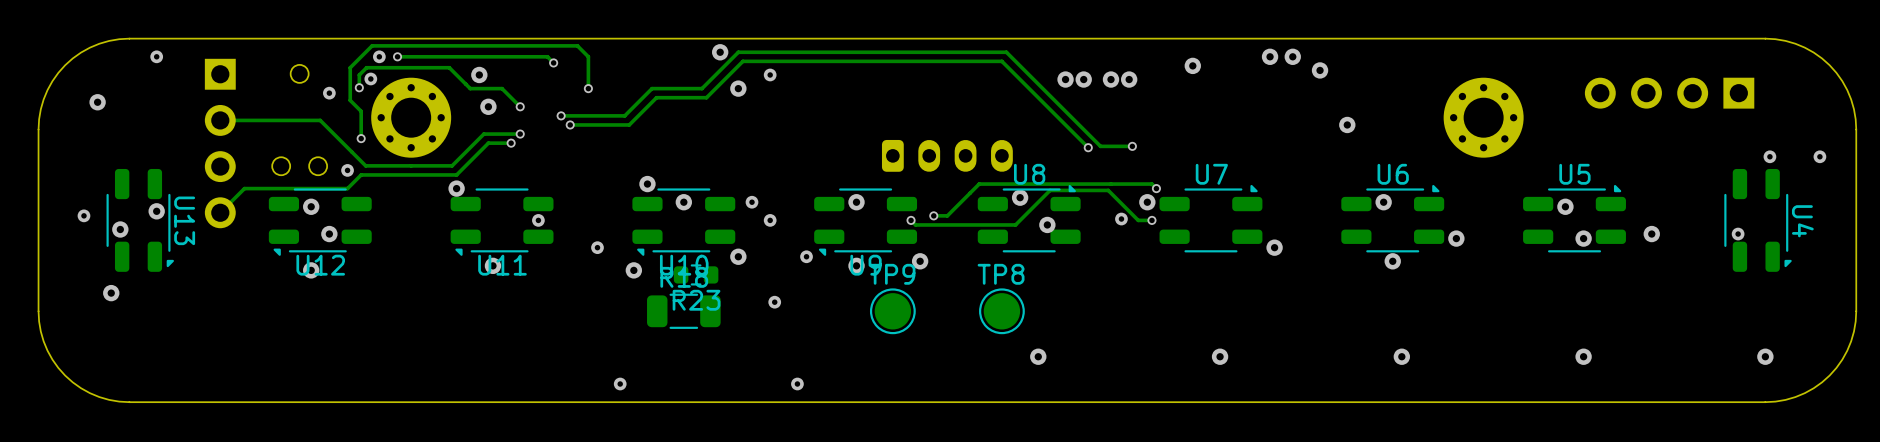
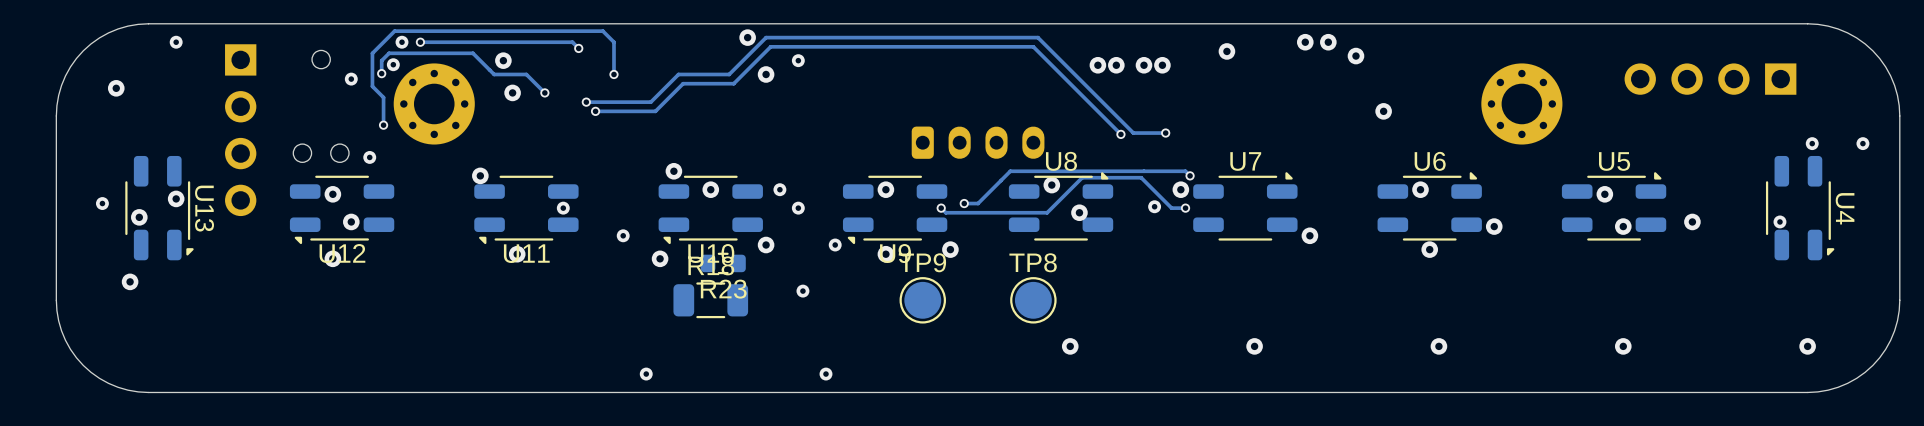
track: (220, 120) (320, 120) (365, 165) (452, 165) (483, 134) (520, 134) -> none
via: (520, 134) -> none
track: (511, 143) (488, 143) (456, 174) (361, 174) (347, 188) (244, 188) (220, 212) -> none
via: (511, 143) -> none

